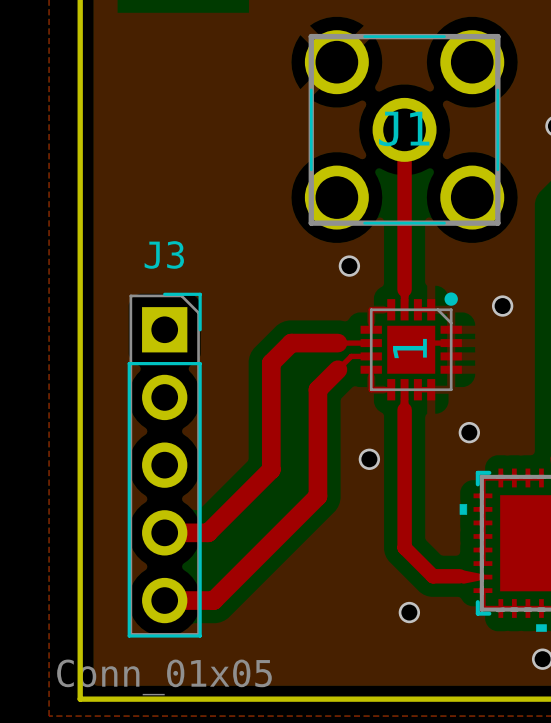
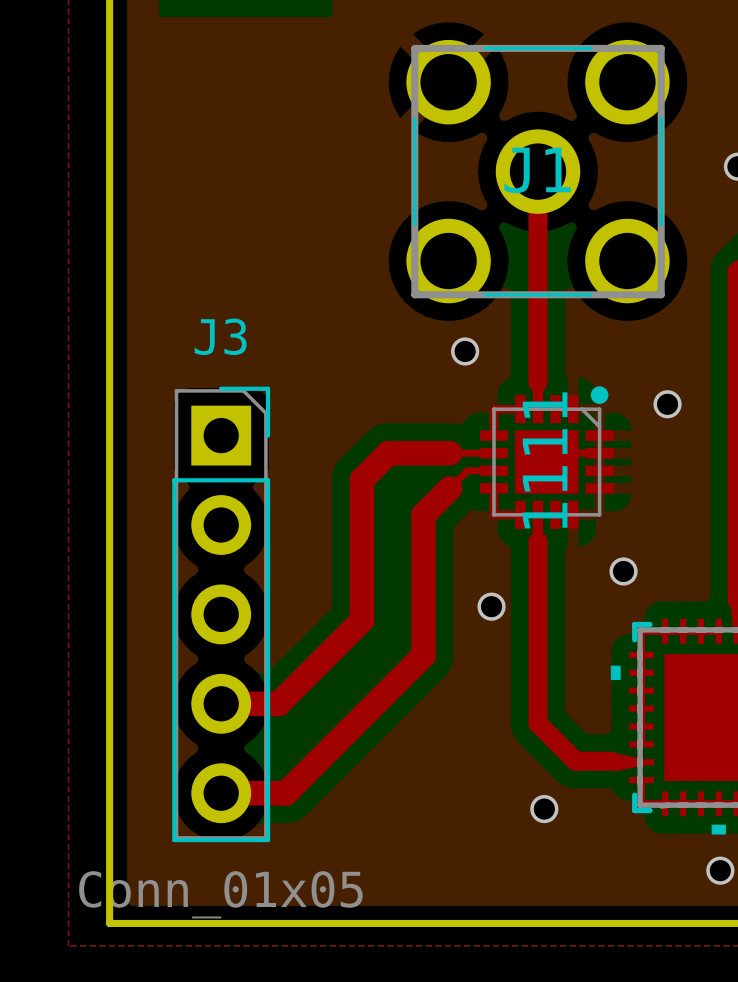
1 name: 1 (409, 348) -> 1111 (545, 460)

